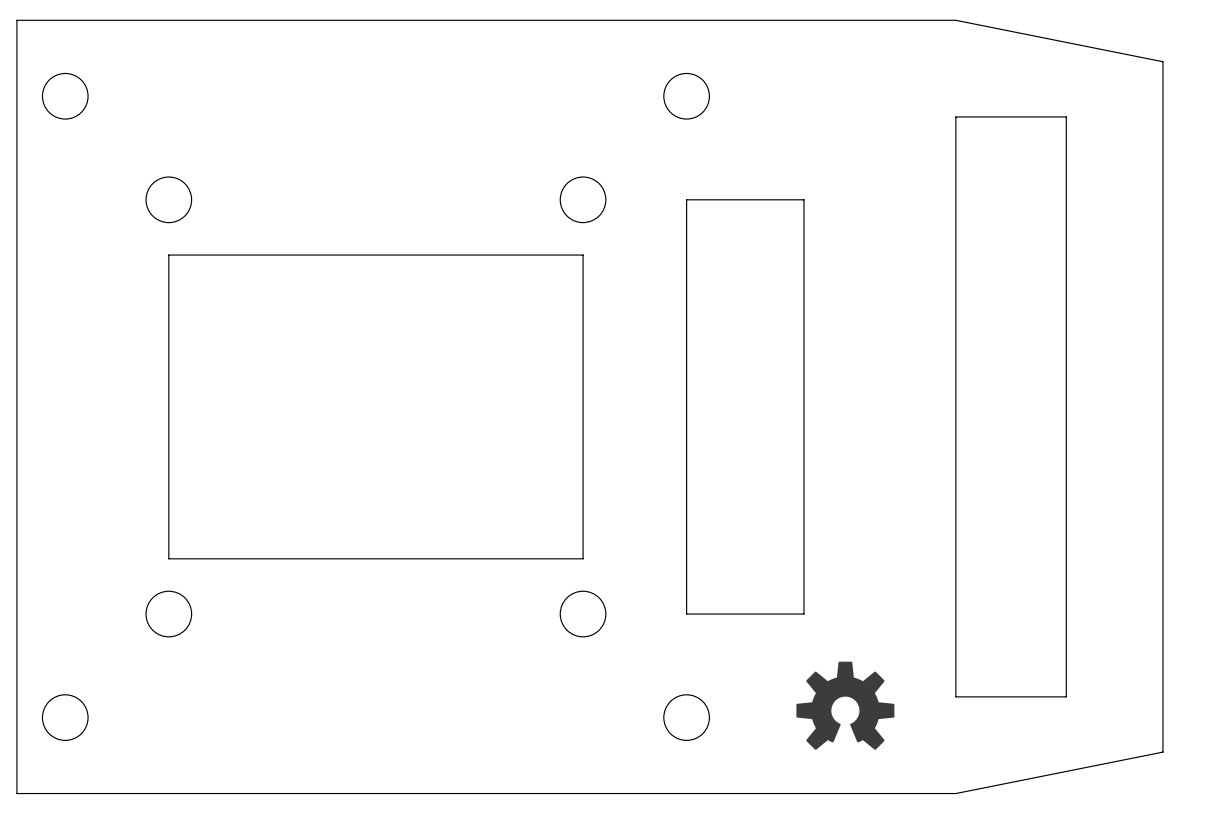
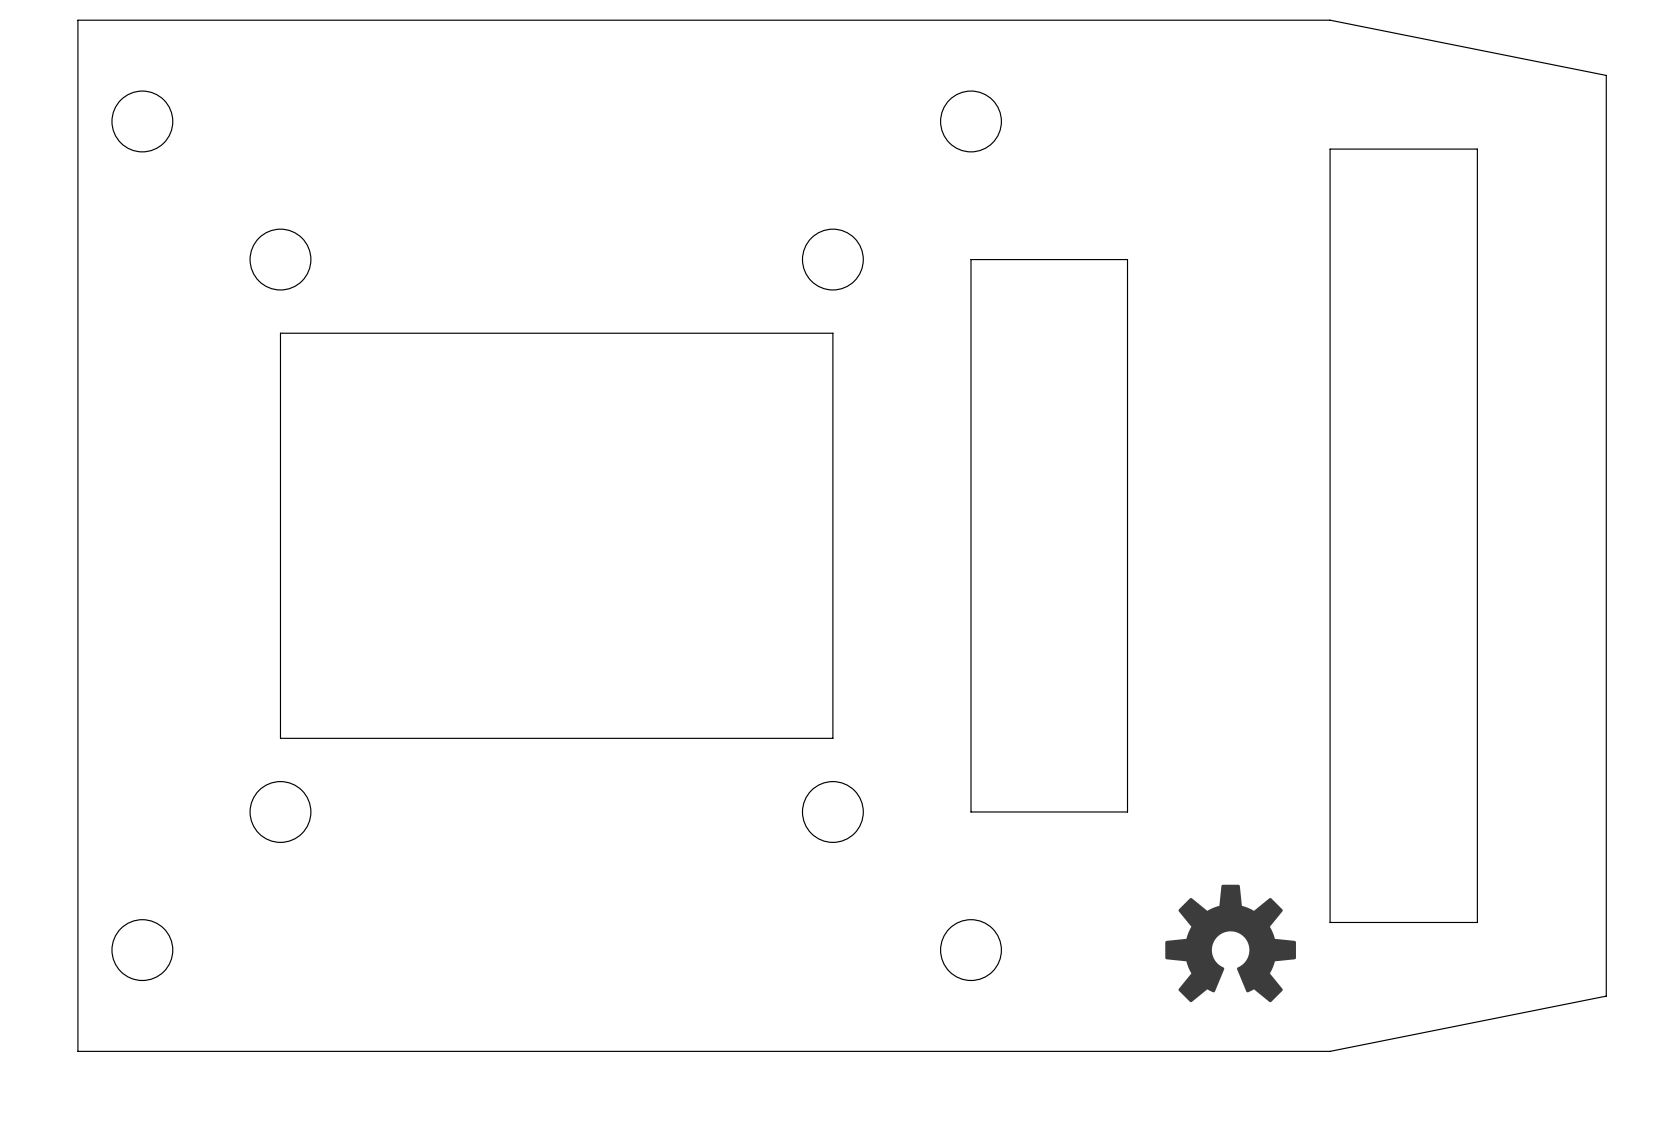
drawing position: (845, 705) -> (1230, 943)

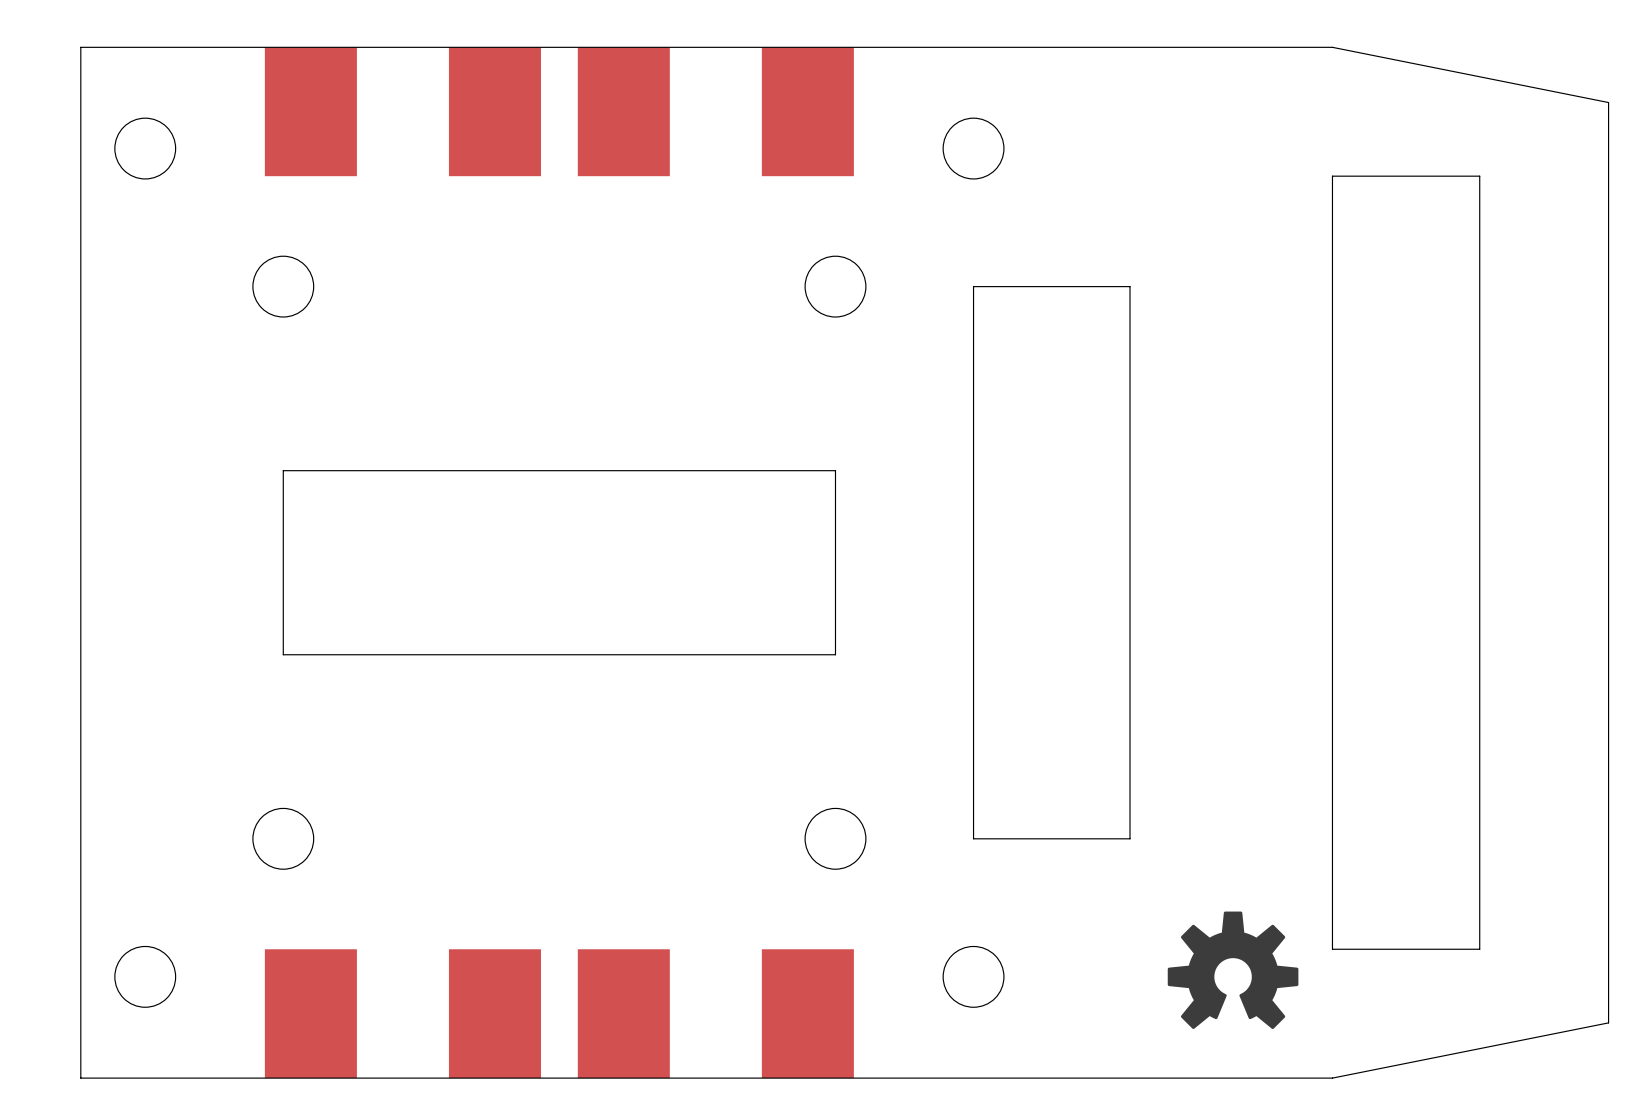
part: none -> (310, 111)
part: none -> (494, 111)
part: none -> (623, 111)
part: none -> (807, 111)
board edge: (280, 443) (280, 333) (832, 333) (832, 443) -> (283, 470) (835, 470)
board edge: (280, 627) (280, 738) (832, 738) (832, 627) -> (283, 654) (835, 654)
part: none -> (310, 1013)
part: none -> (494, 1013)
part: none -> (623, 1013)
part: none -> (807, 1013)

